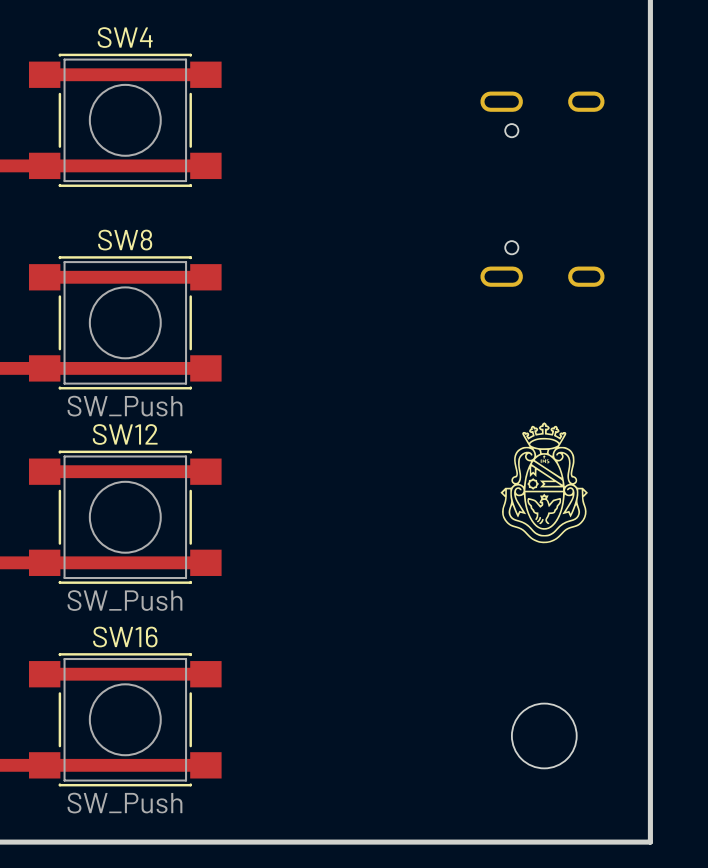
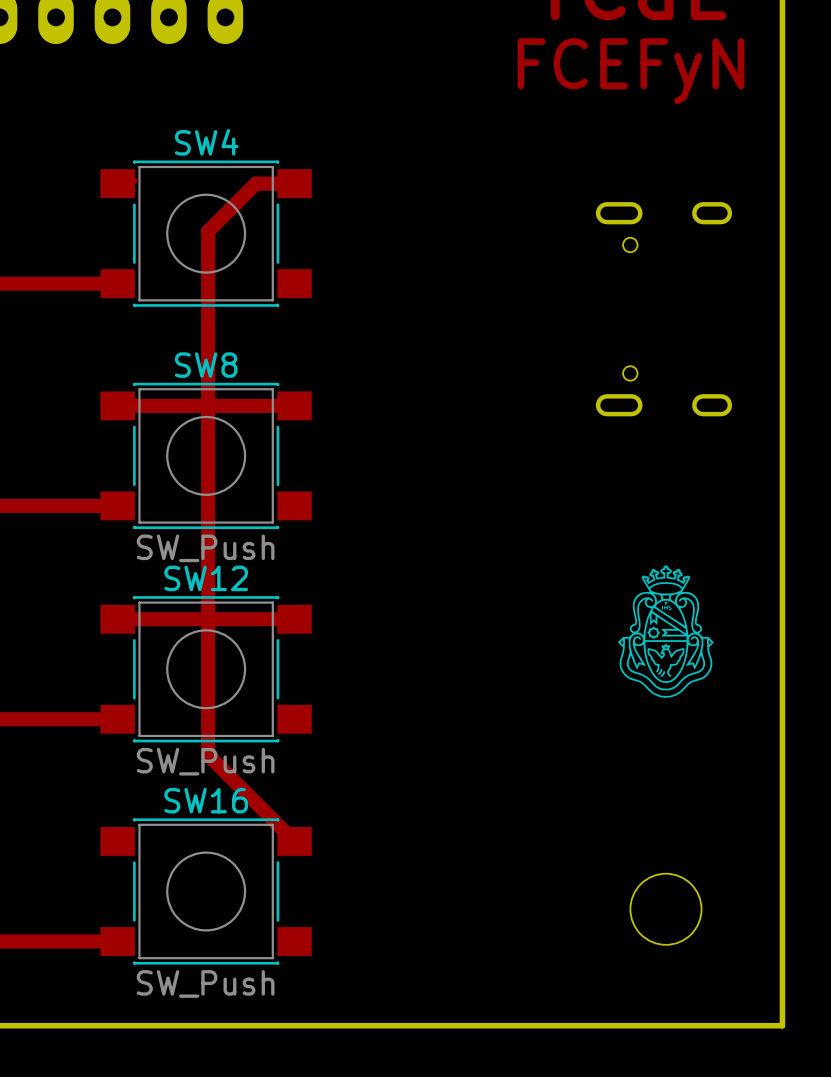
track: (44, 74) (170, 74) -> none
track: (44, 165) (205, 165) -> none
track: (44, 368) (205, 368) -> none
track: (44, 562) (205, 562) -> none
track: (44, 674) (205, 674) -> (255, 183) (208, 231) (208, 755) (294, 841)
track: (44, 765) (205, 765) -> none

